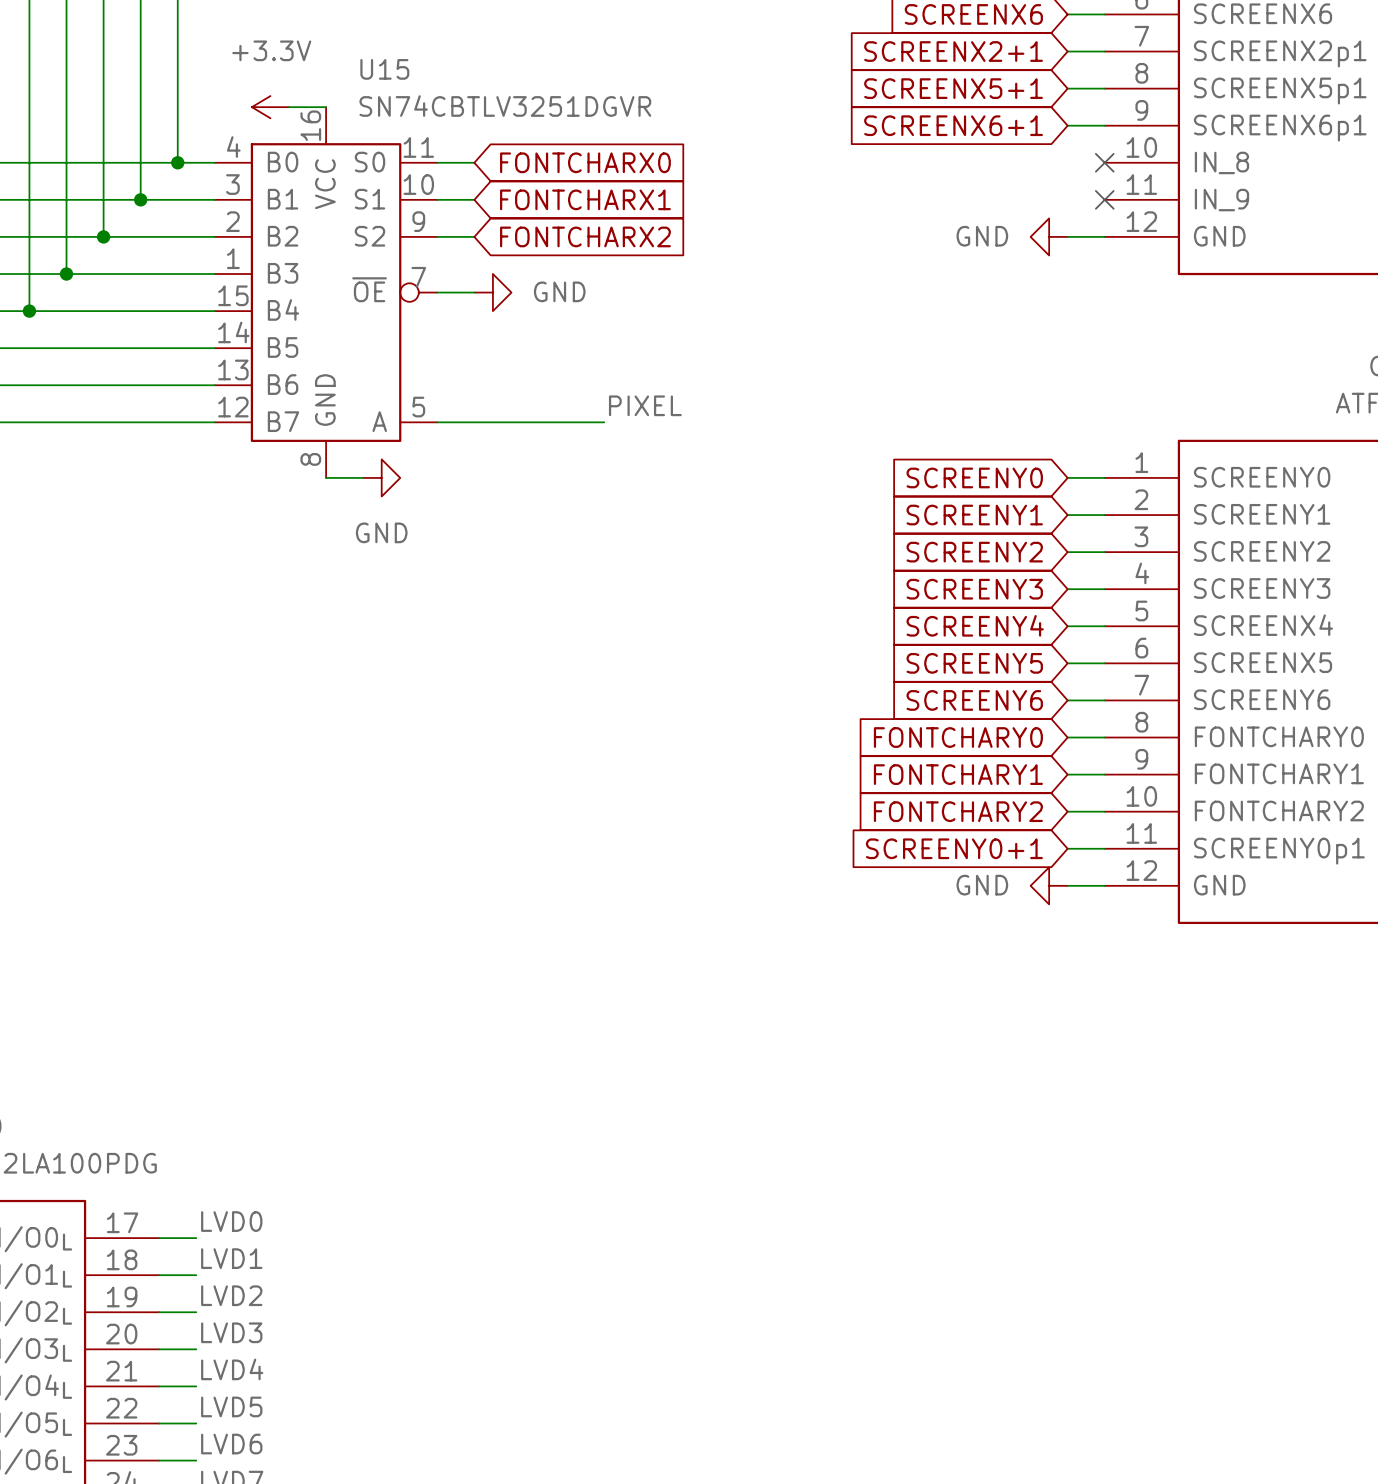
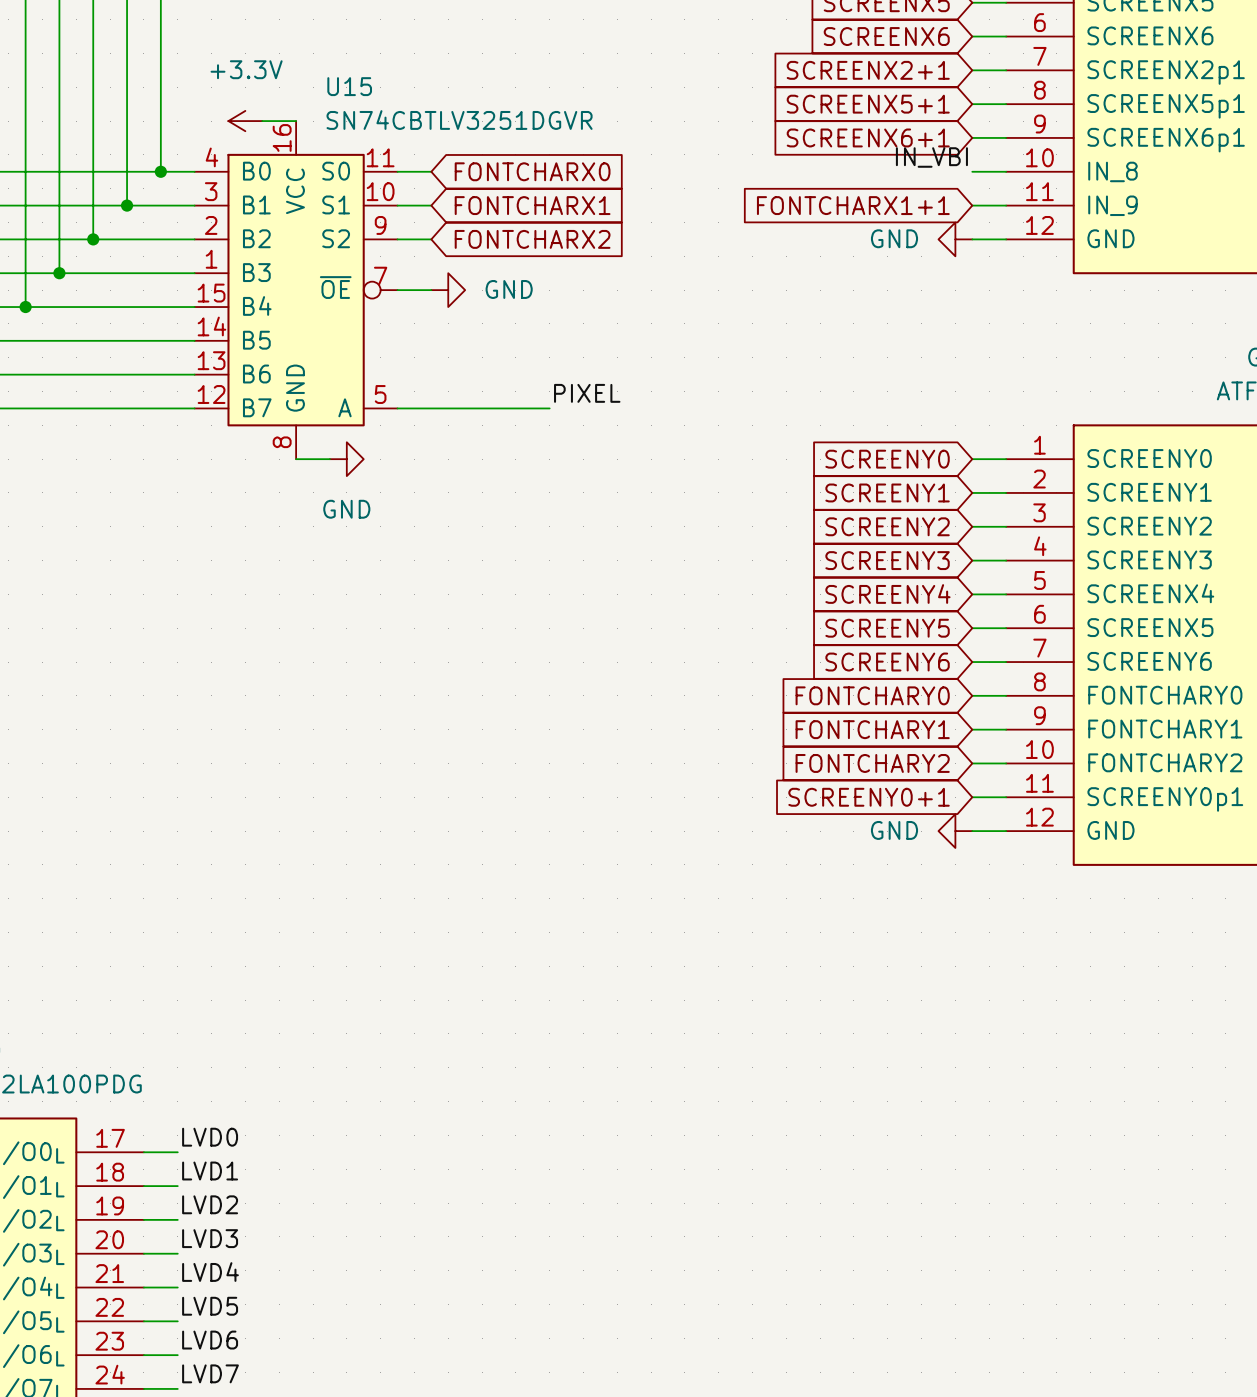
label: none -> IN_VBI (931, 157)
wire: none -> (972, 171) (1006, 171)
no-connect mark: (1104, 162) -> none
global label: none -> FONTCHARX1+1 (853, 205)
wire: none -> (972, 205) (1006, 205)
no-connect mark: (1104, 199) -> none

